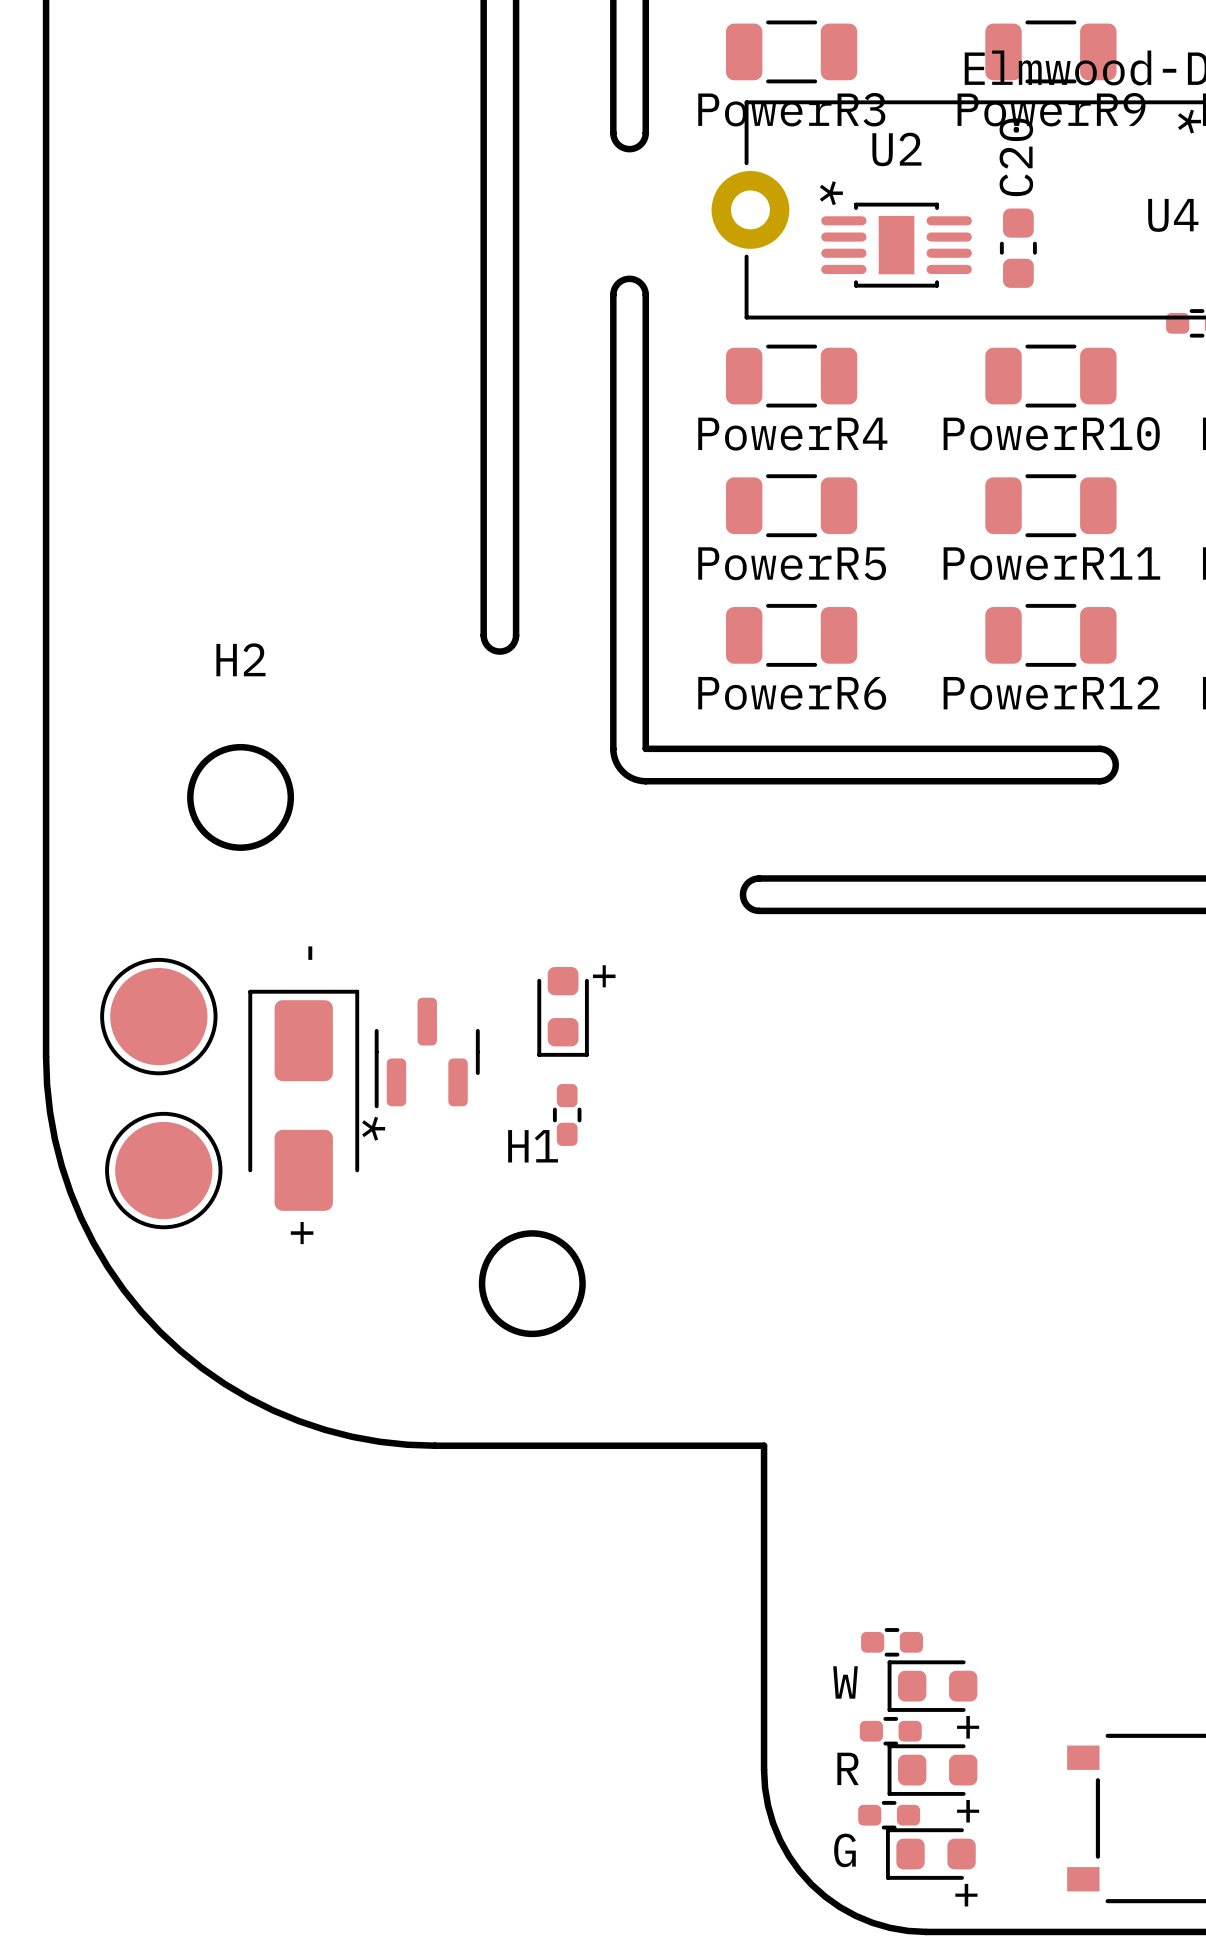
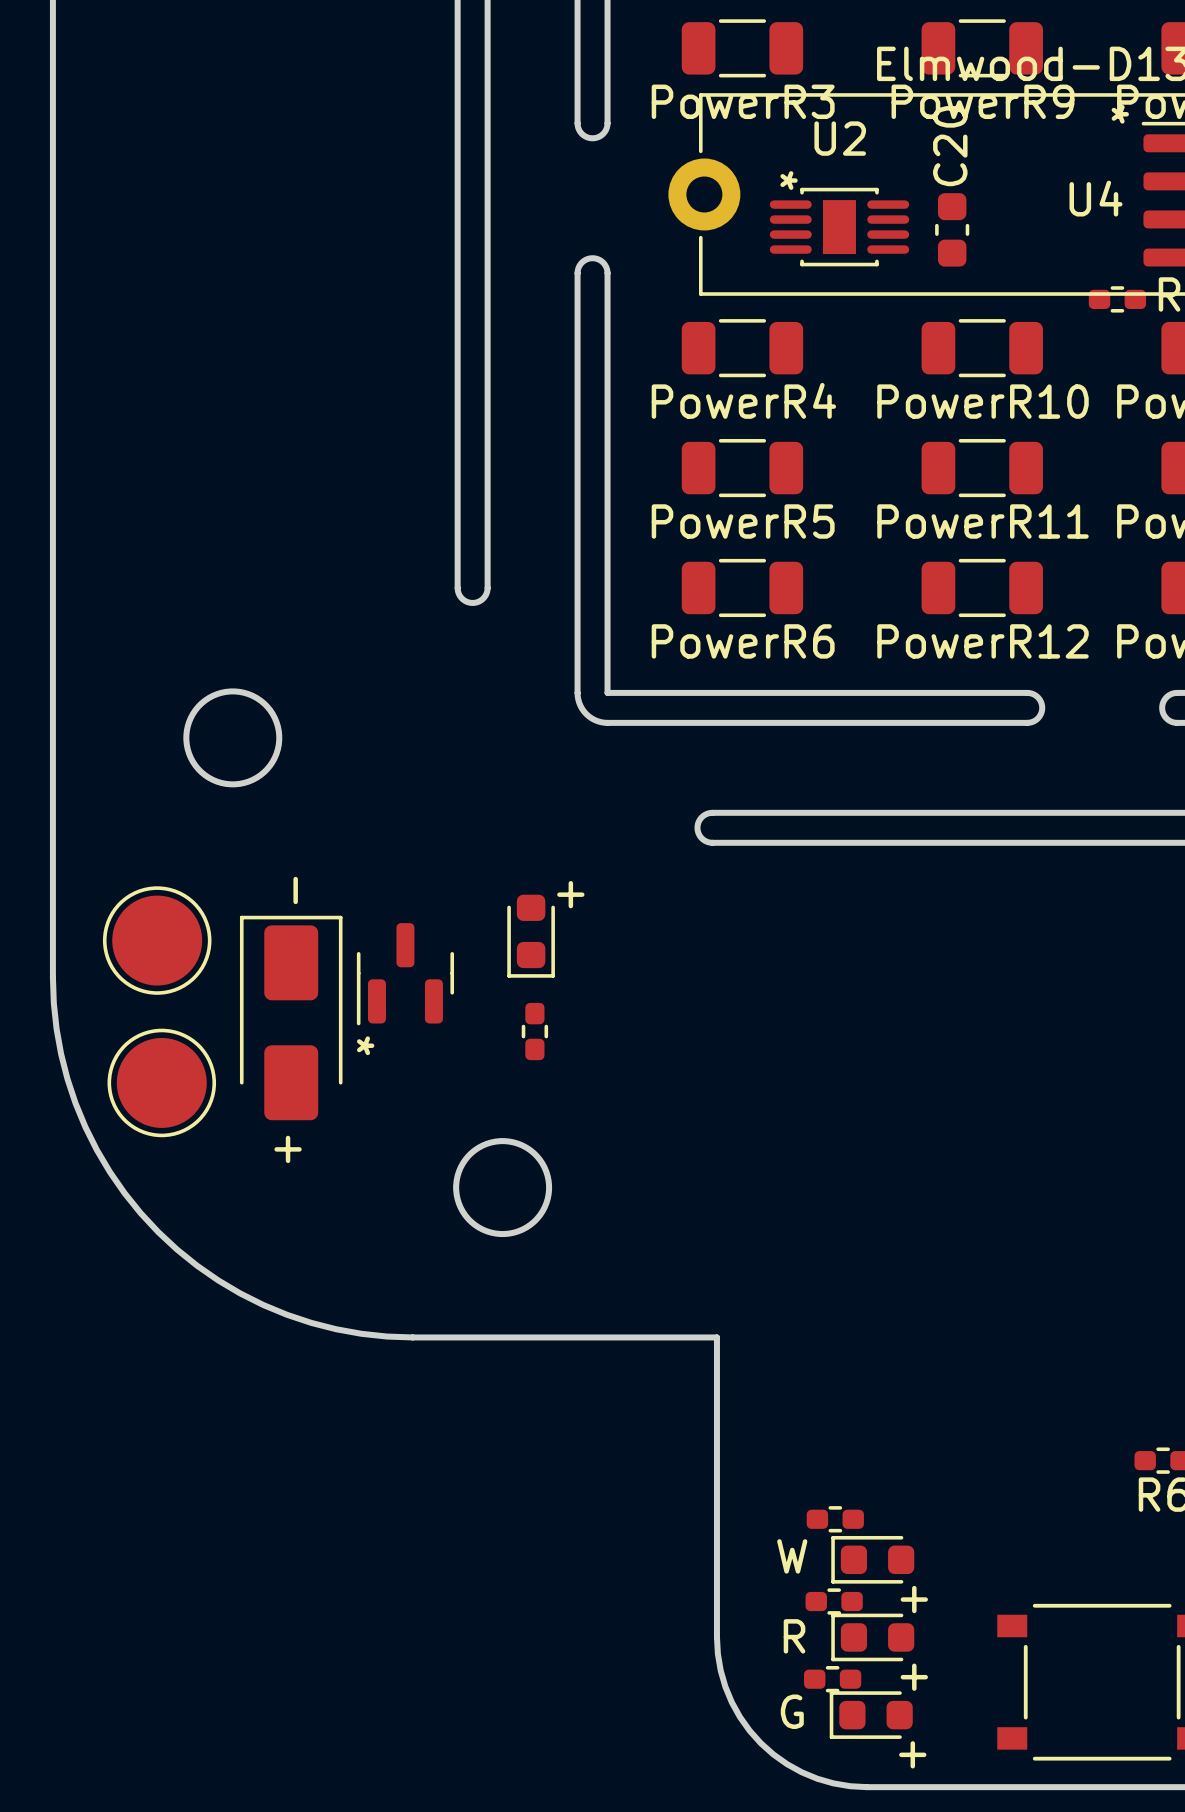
H2 name: H2 (240, 659) -> none
H1 name: H1 (533, 1146) -> none

